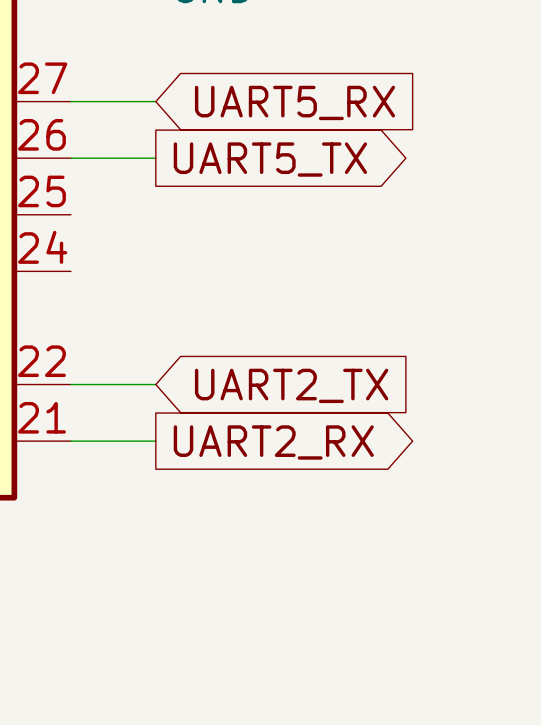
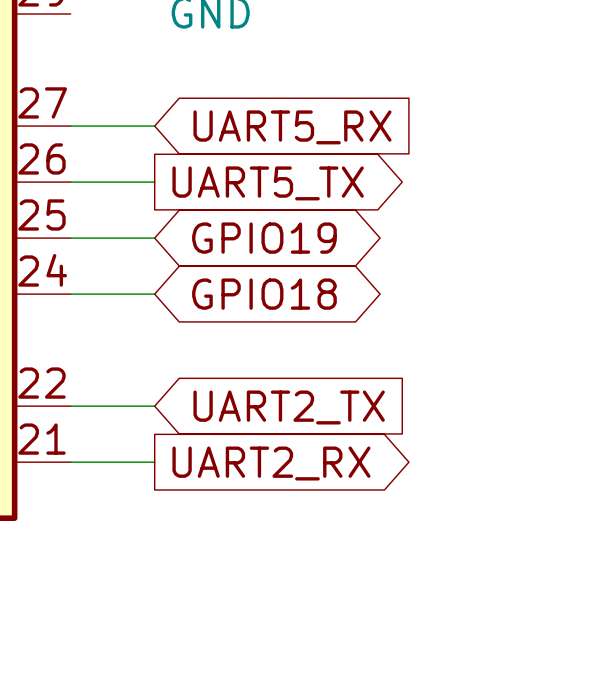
wire: none -> (70, 238) (154, 238)
global label: none -> GPIO19 (264, 238)
wire: none -> (70, 294) (154, 294)
global label: none -> GPIO18 (264, 294)

